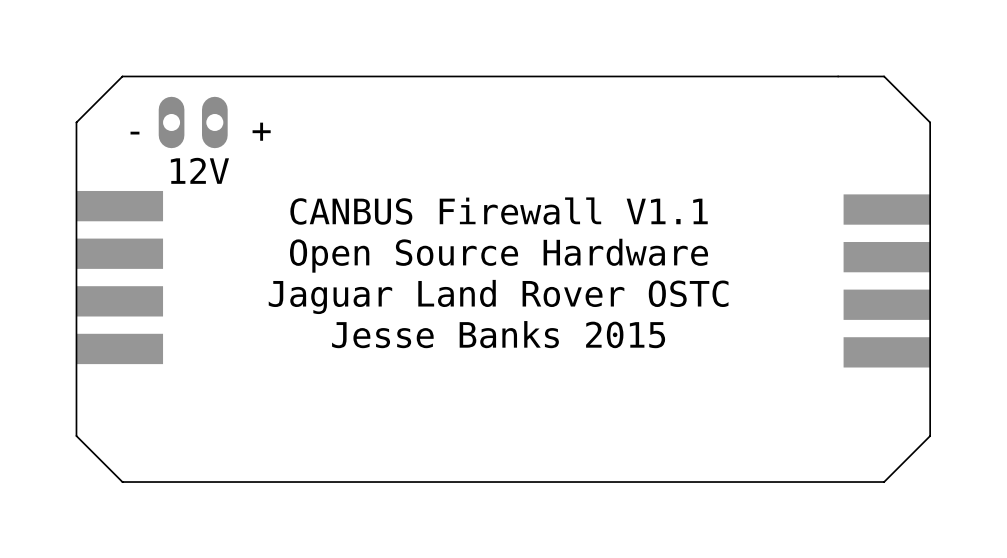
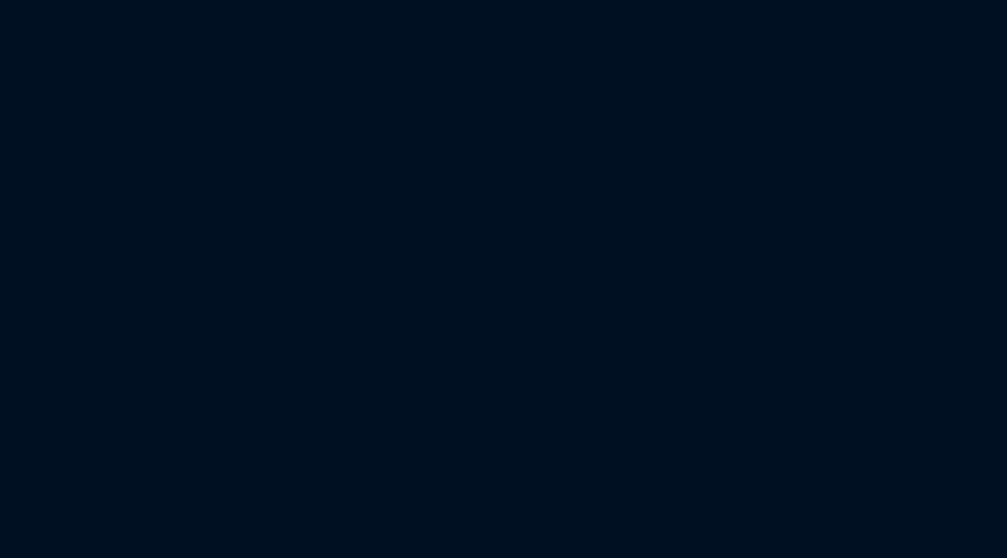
board edge: (884, 76) (122, 76) (76, 122) (76, 436) (122, 482) (884, 482) (930, 436) (930, 122) (884, 76) -> none
part: (193, 122) -> none
text: - + (200, 131) -> none
text: 12V (199, 170) -> none
text: CANBUS Firewall V1.1 (499, 211) -> none
text: Open Source Hardware (499, 255) -> none
part: (119, 277) -> none
part: (886, 280) -> none
text: Jaguar Land Rover OSTC (498, 296) -> none
text: Jesse Banks 2015 (498, 334) -> none

